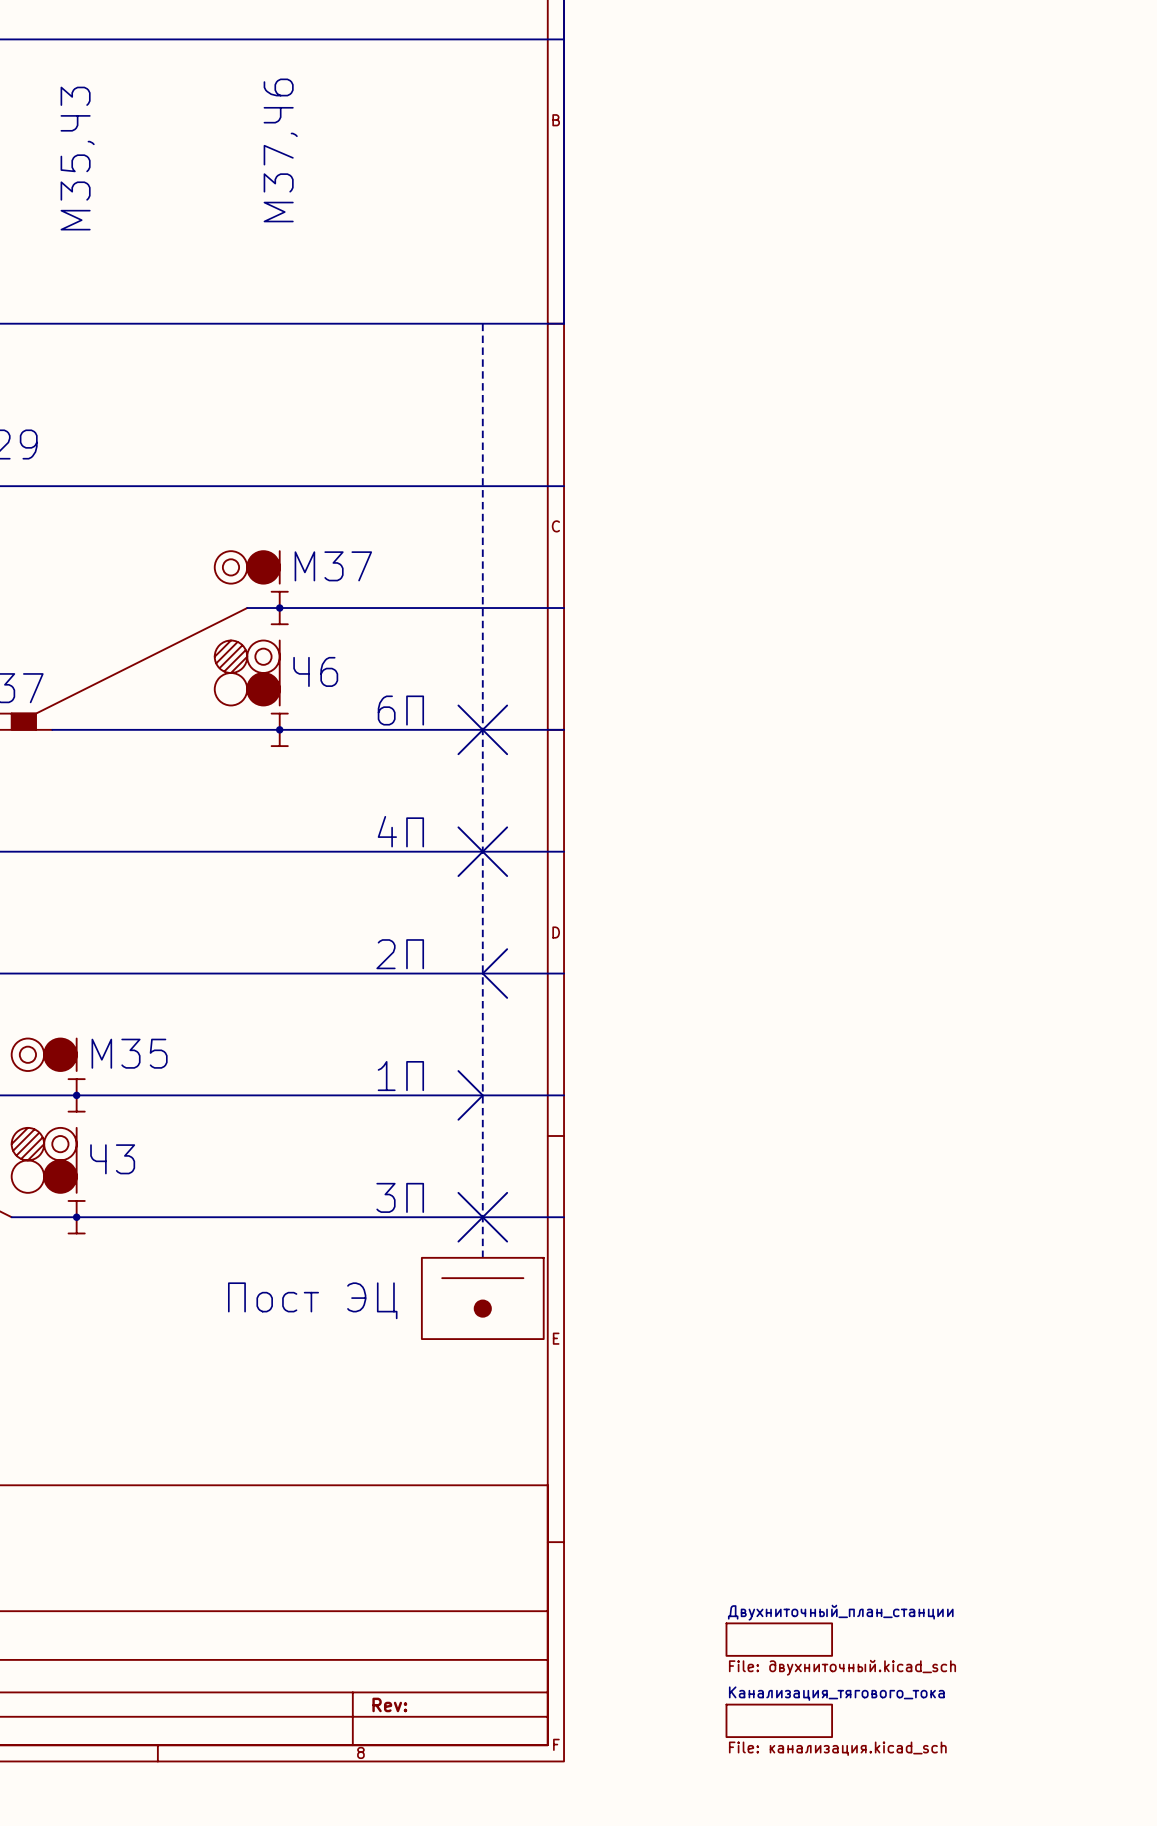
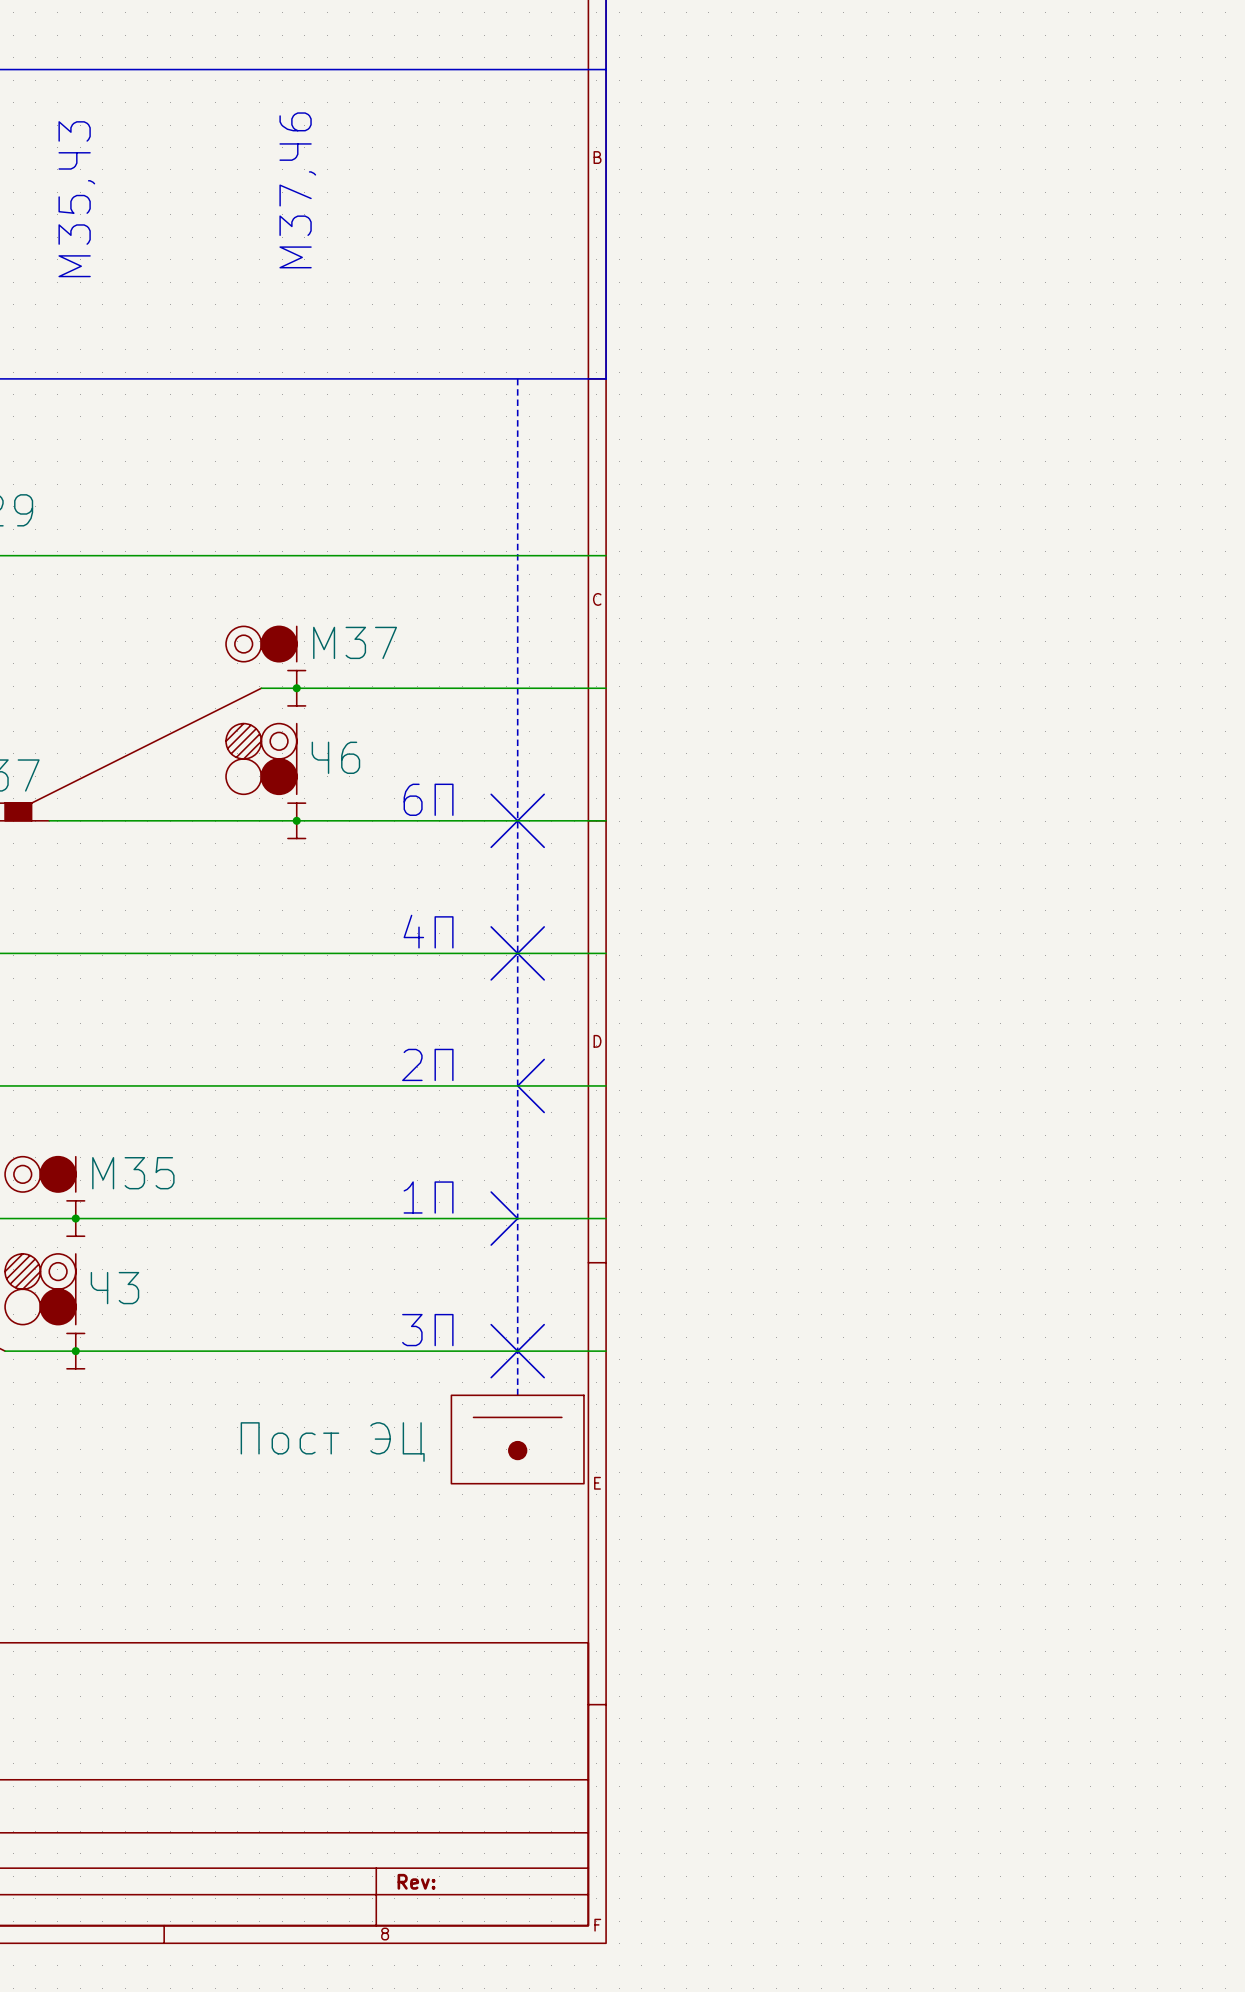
sheet Двухниточный_план_станции: File: двухниточный.kicad_sch (779, 1639) -> none
sheet Канализация_тягового_тока: File: канализация.kicad_sch (779, 1720) -> none

